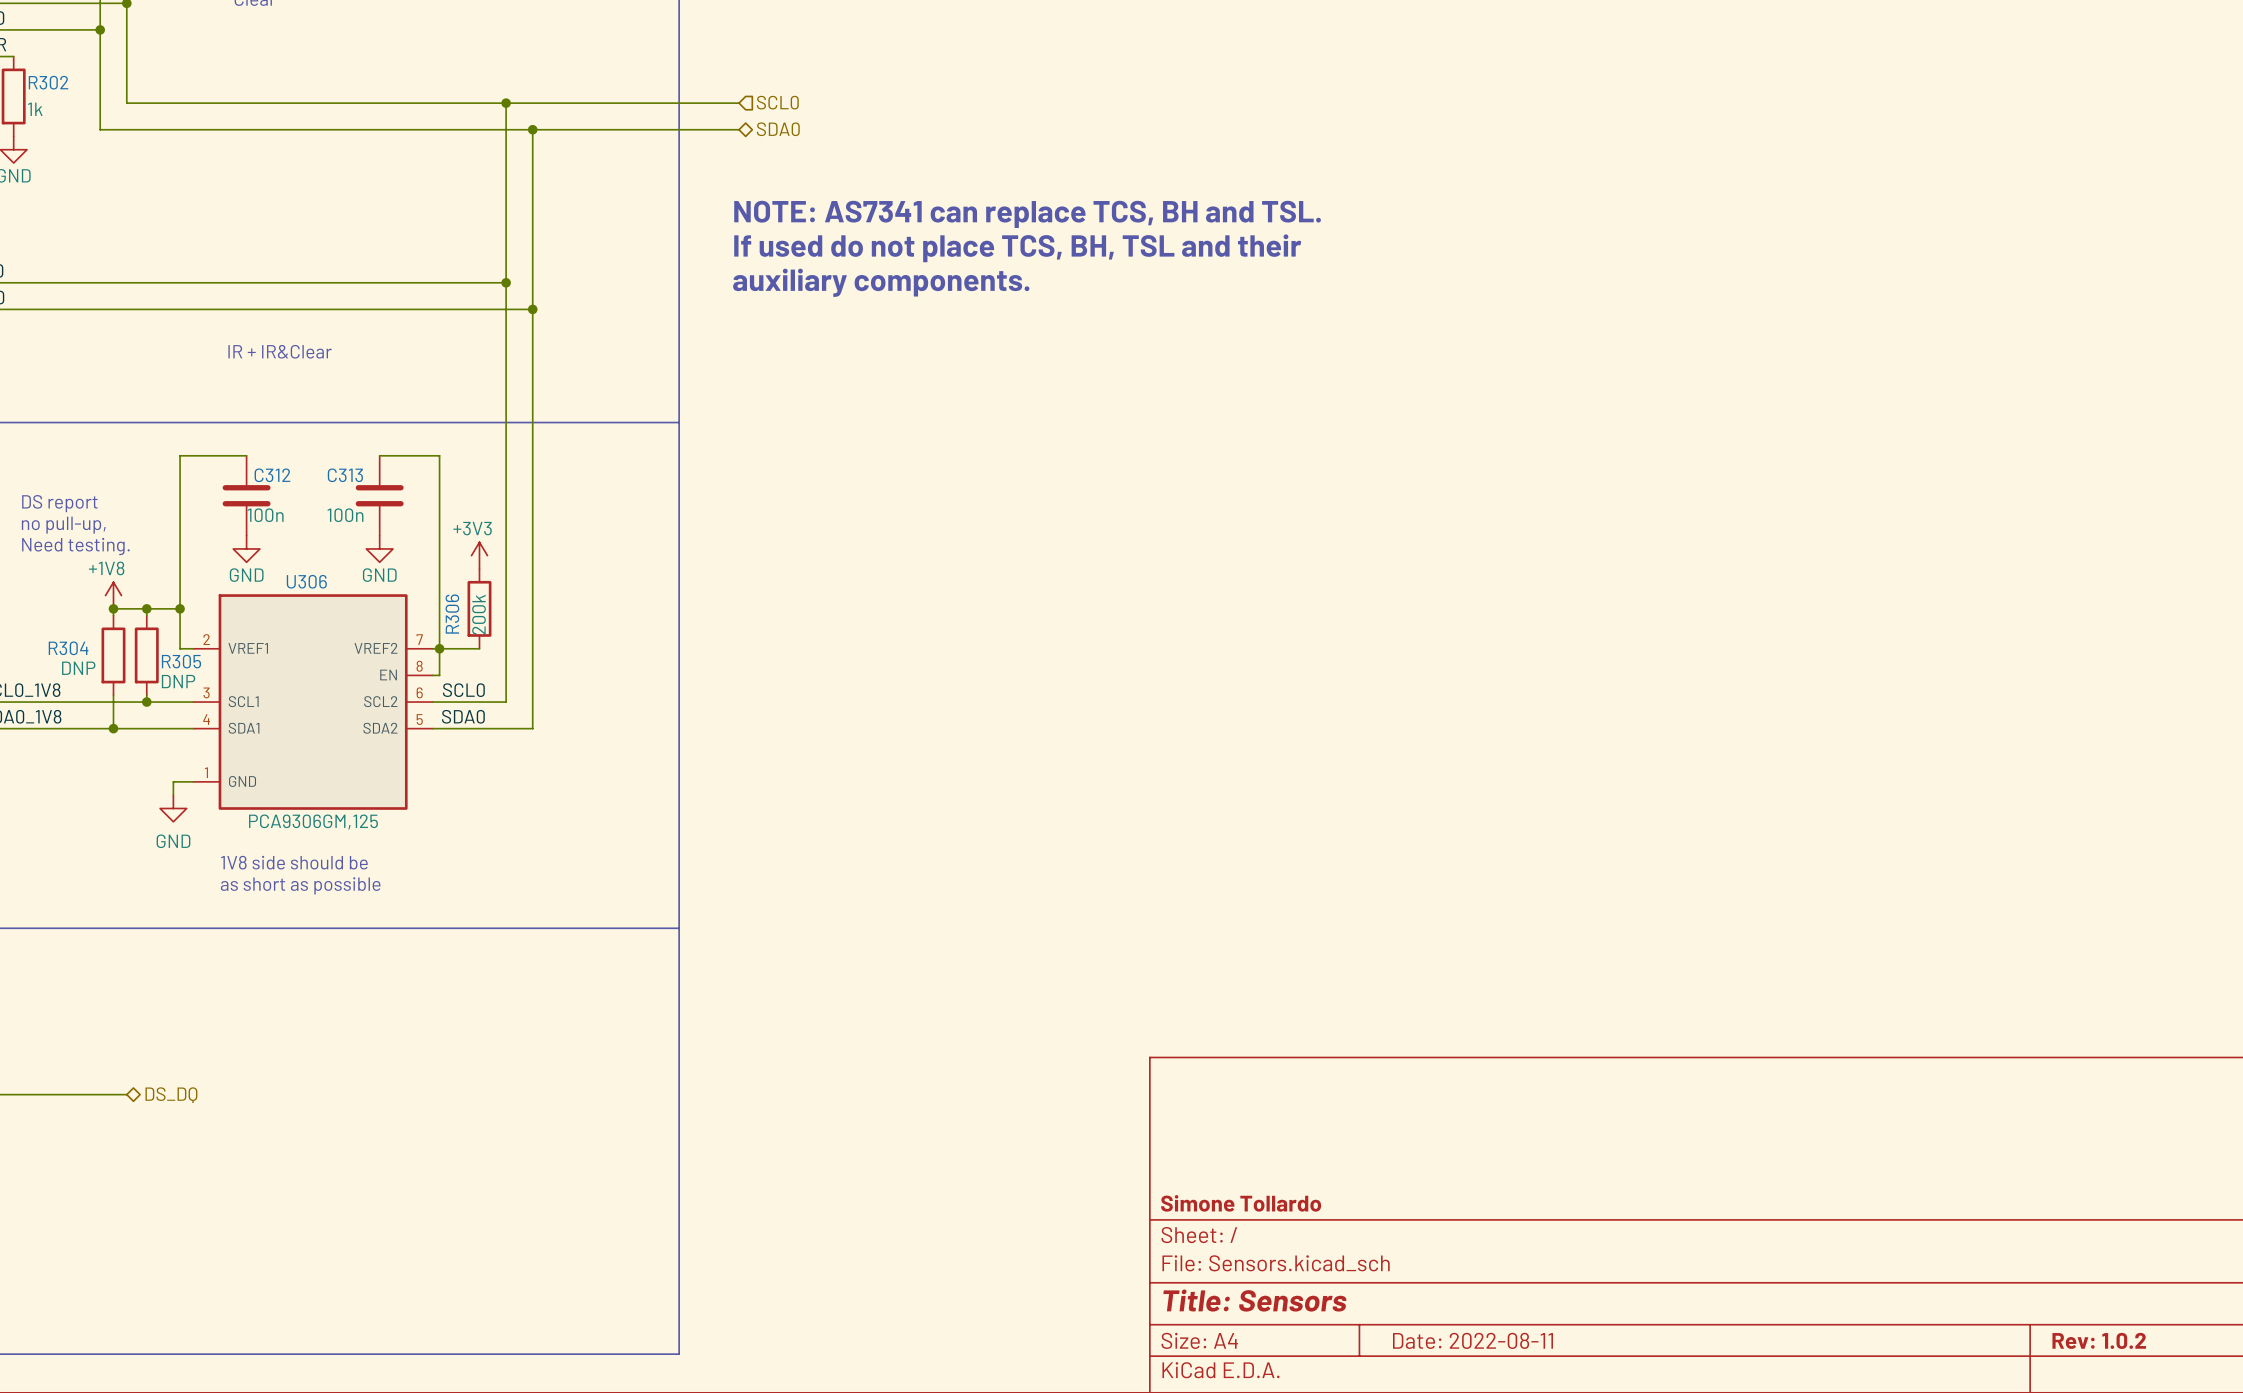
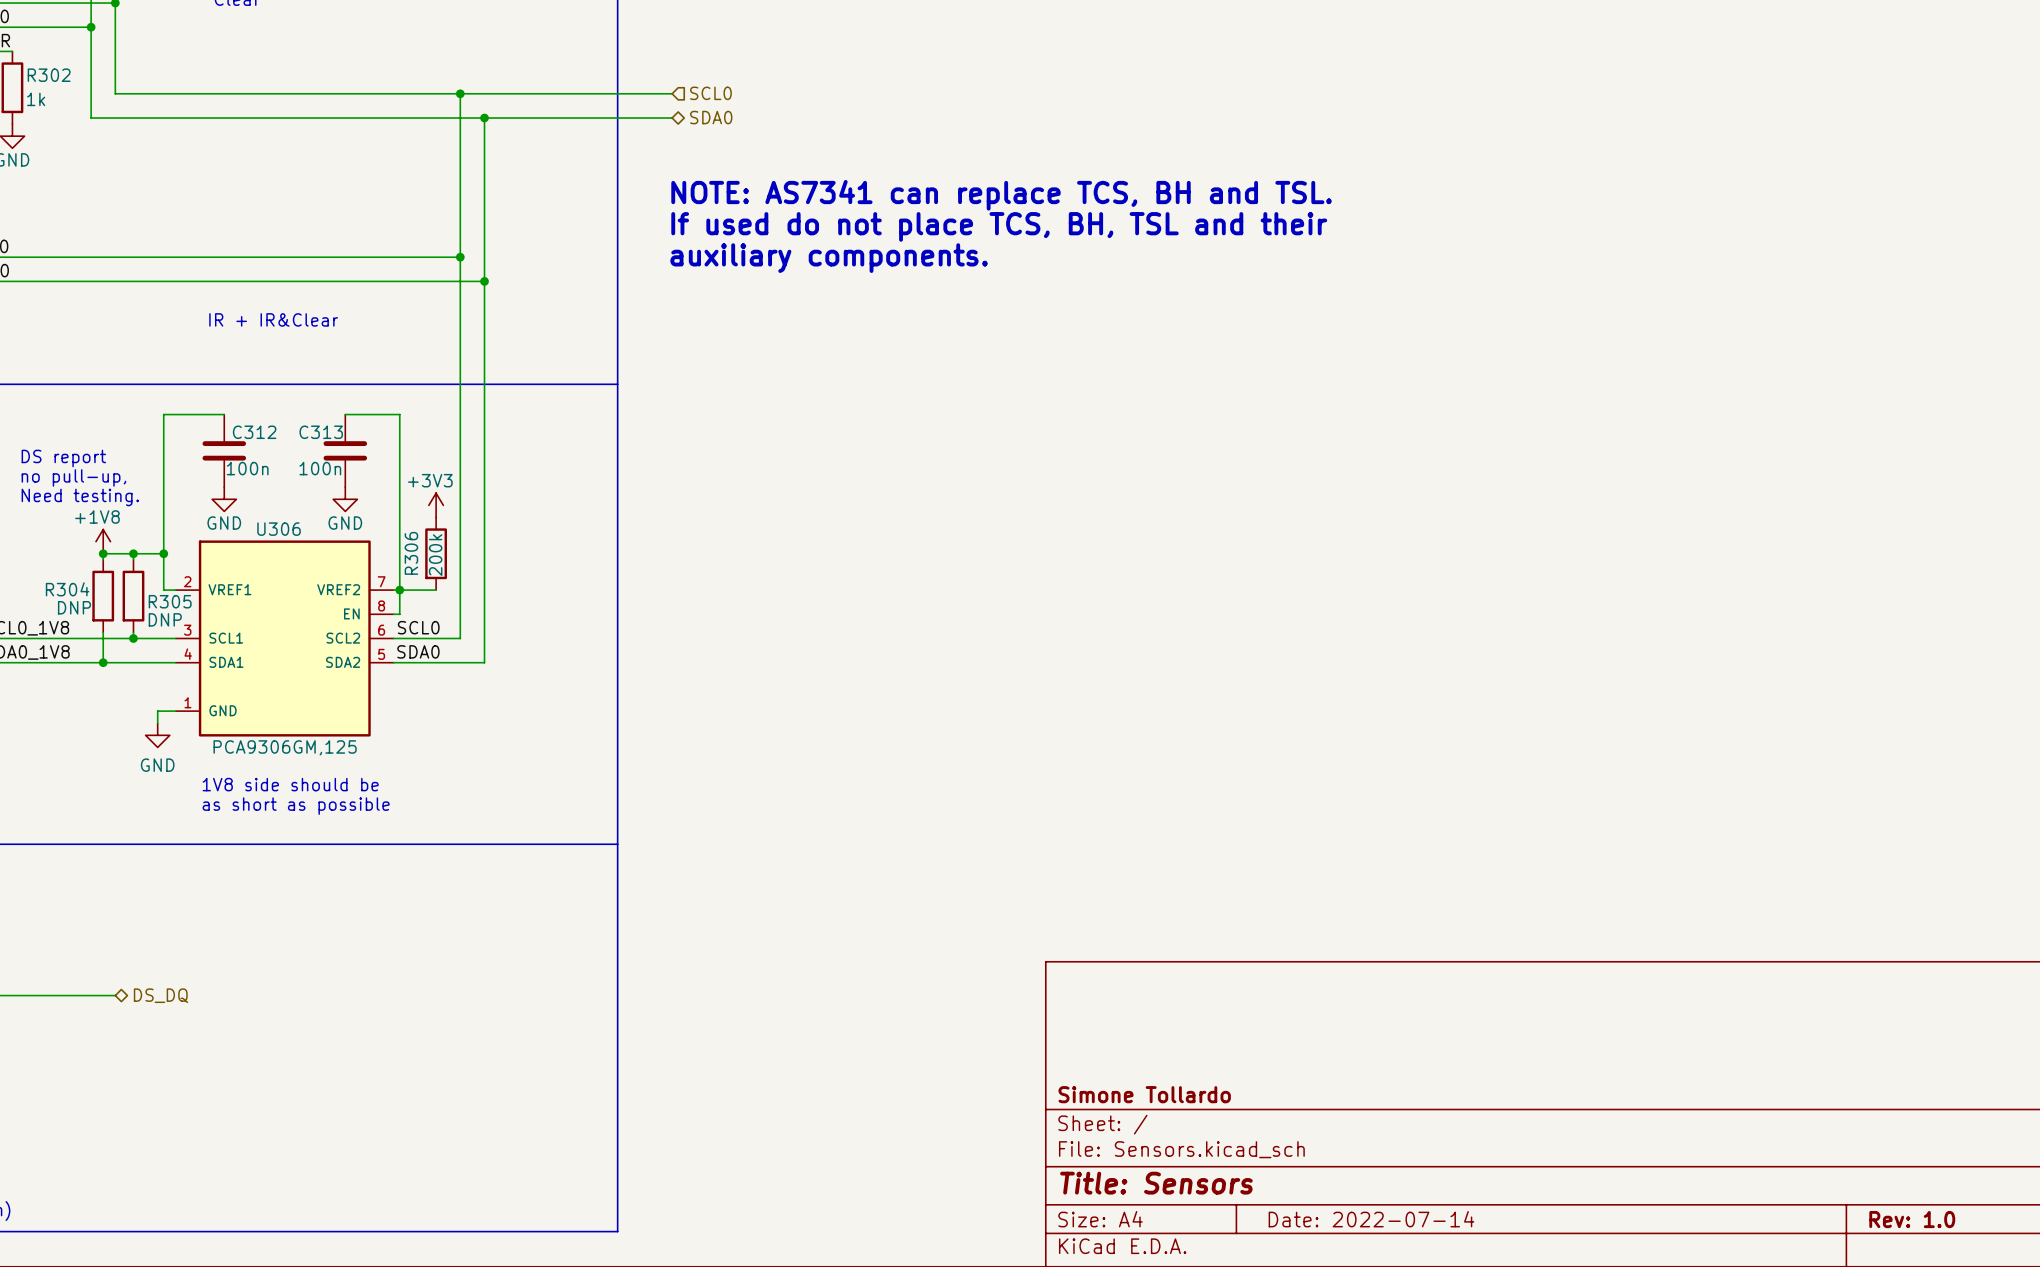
title block: Date: 2022-08-11 (1472, 1340) -> Date: 2022-07-14 (1371, 1219)
title block: Rev: 1.0.2 (2099, 1340) -> Rev: 1.0 (1912, 1219)

